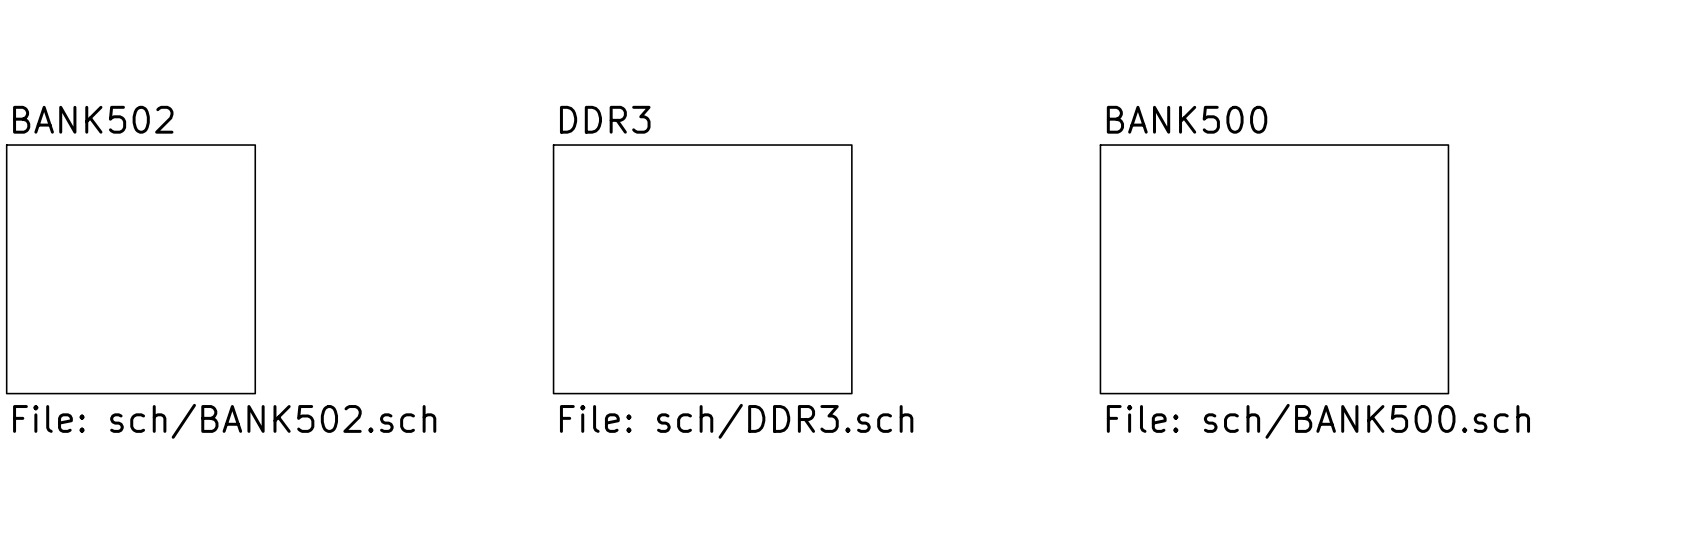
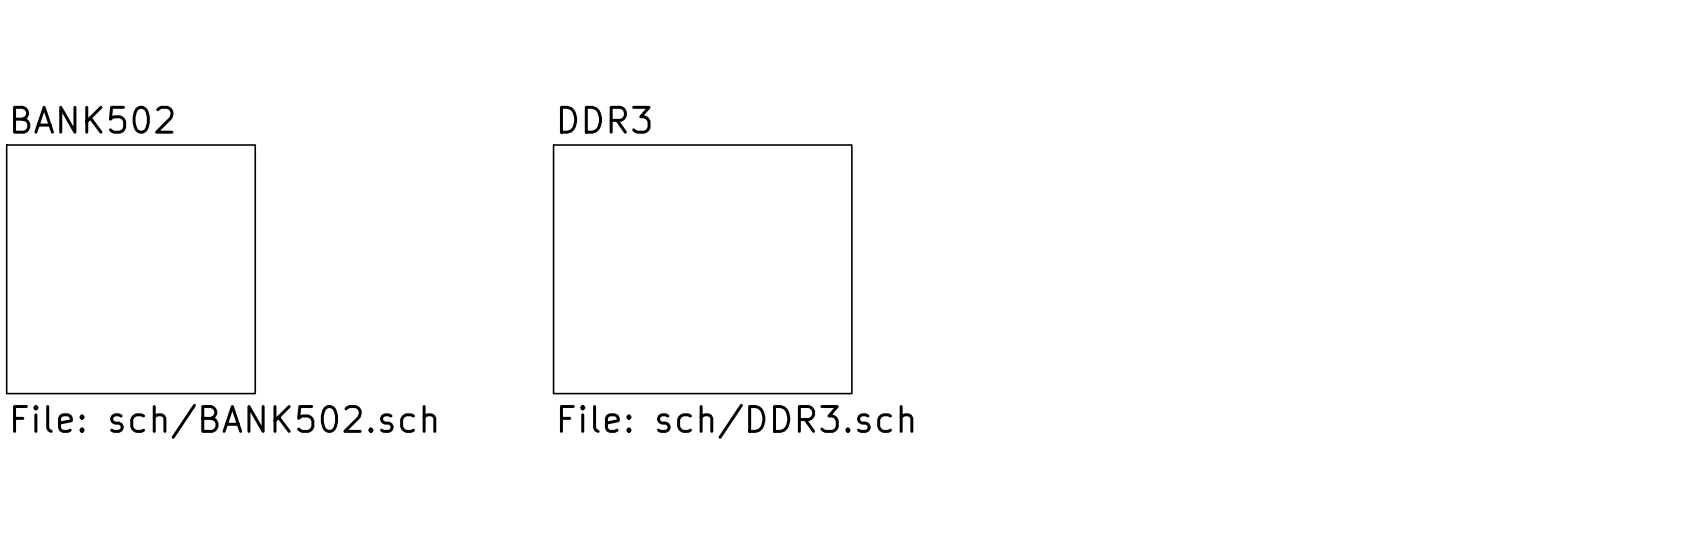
sheet BANK500: File: sch/BANK500.sch (1274, 269) -> none

